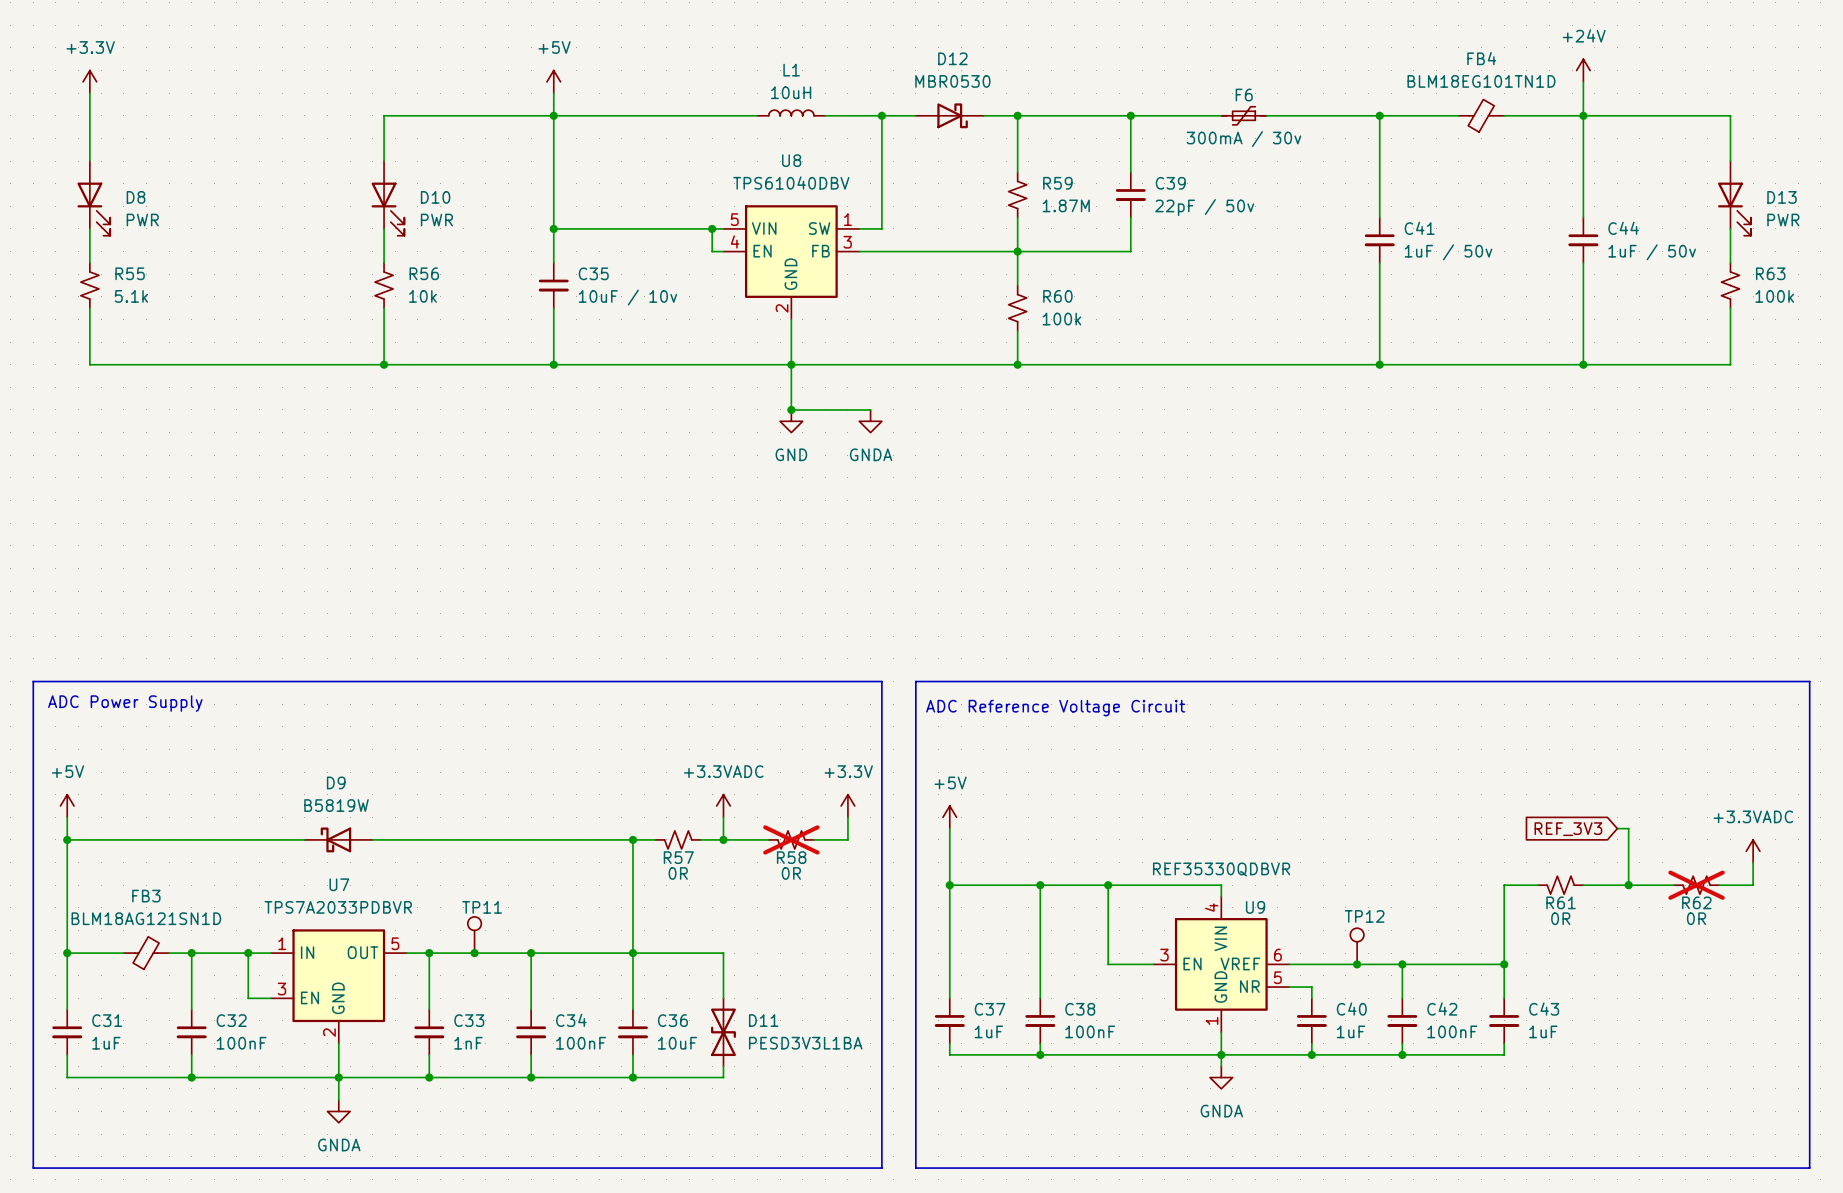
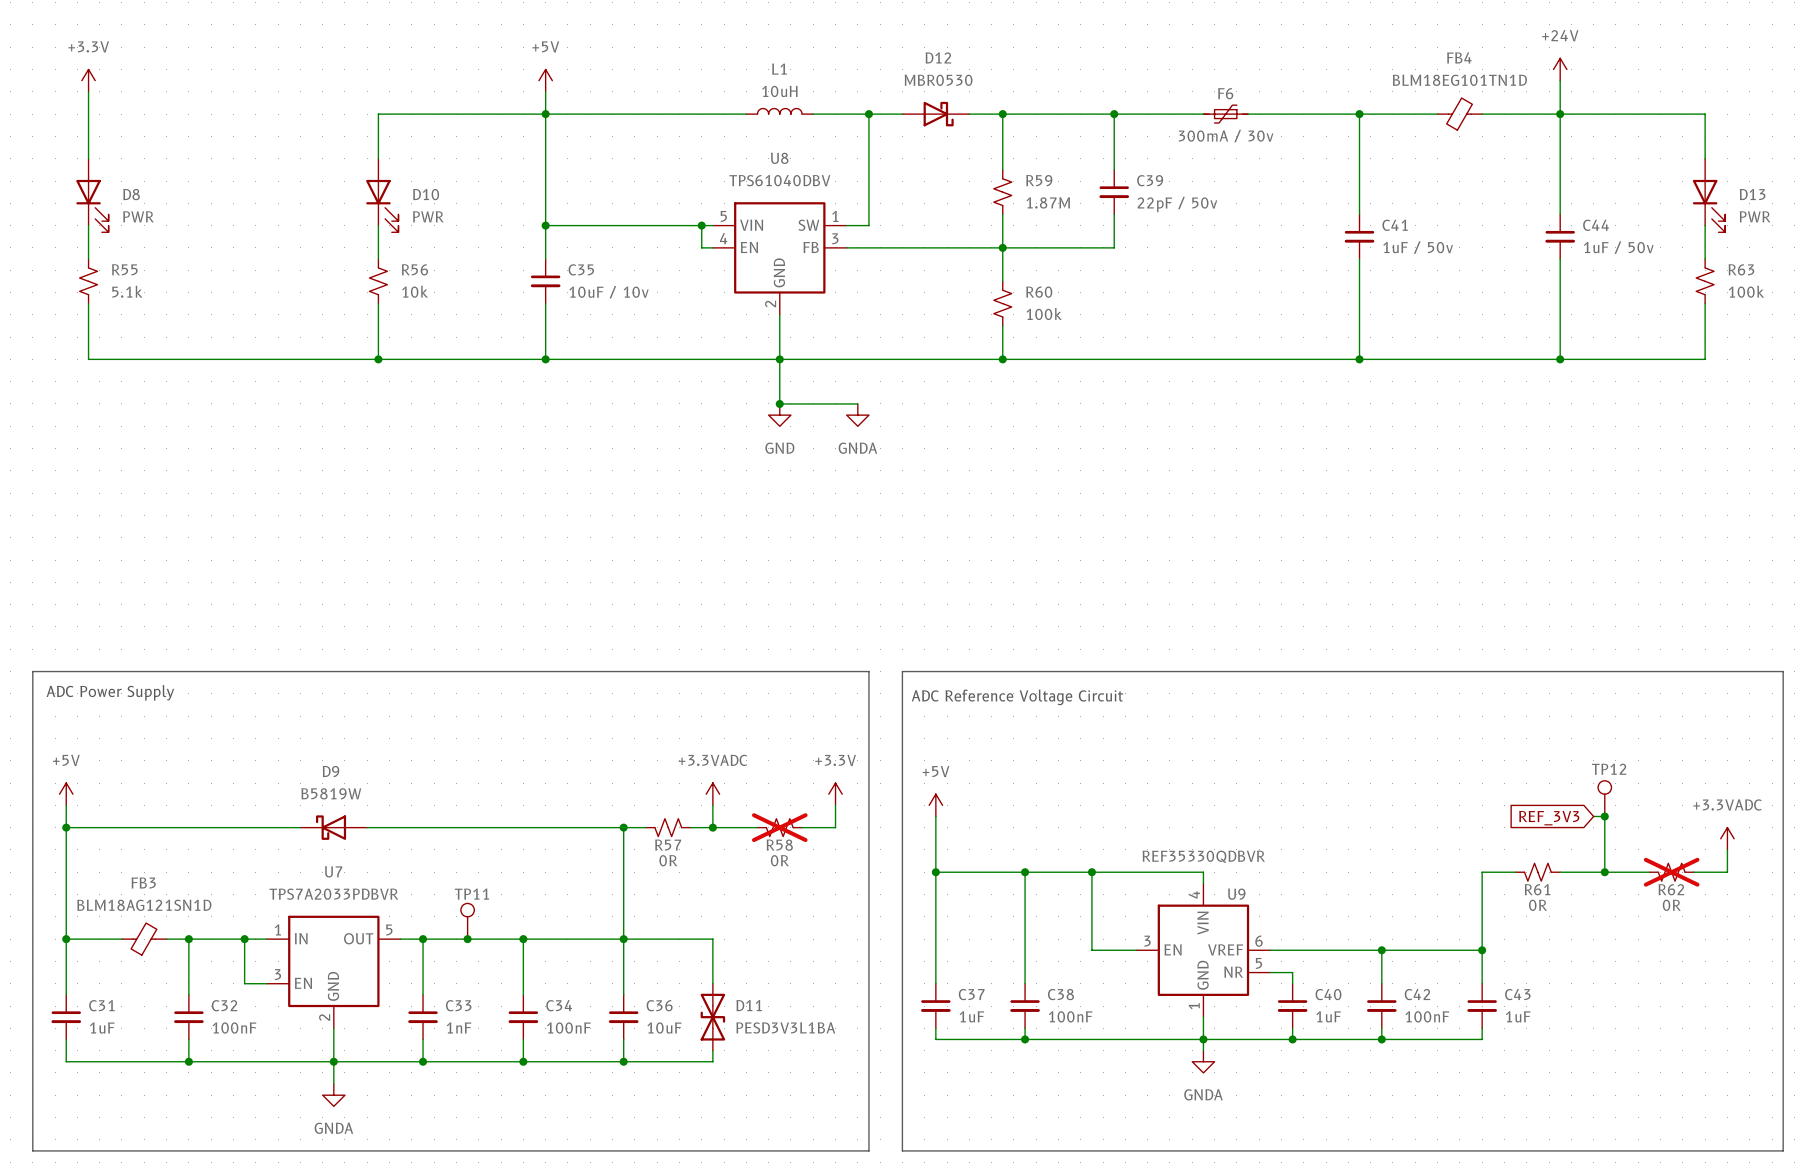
junction: none -> (1604, 816)
TP12 position: (1357, 946) -> (1604, 798)
junction: (1357, 964) -> none

